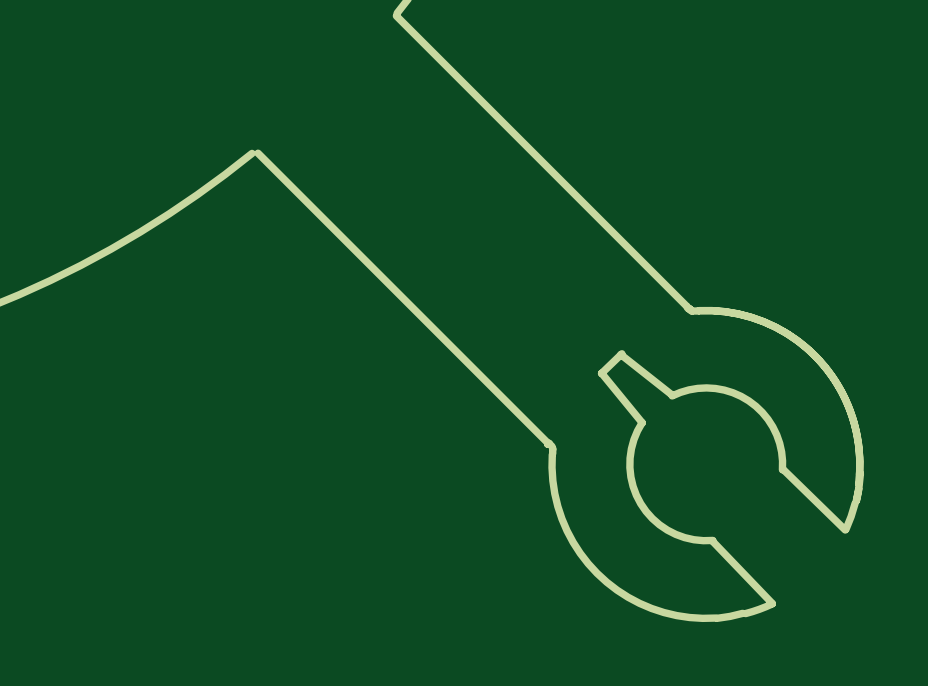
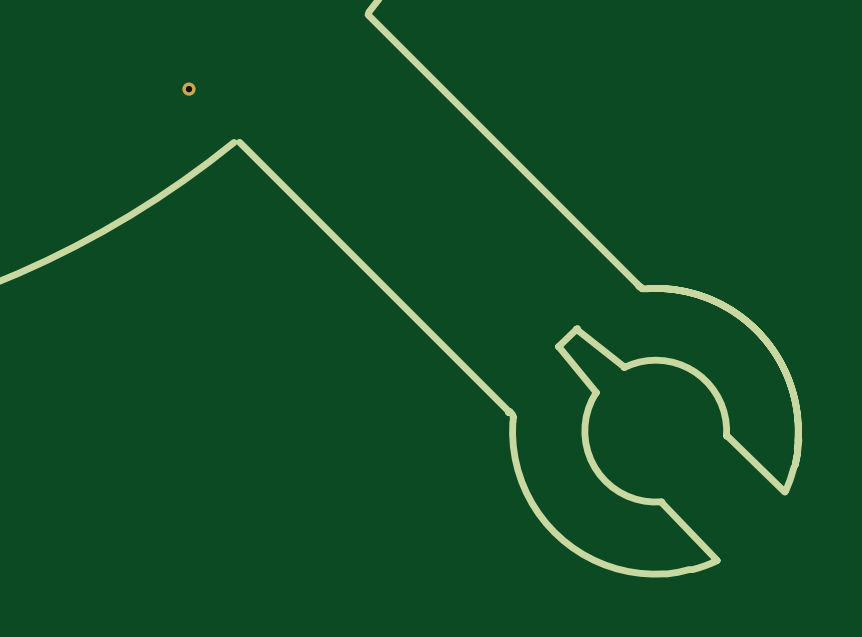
via: none -> (188, 89)

